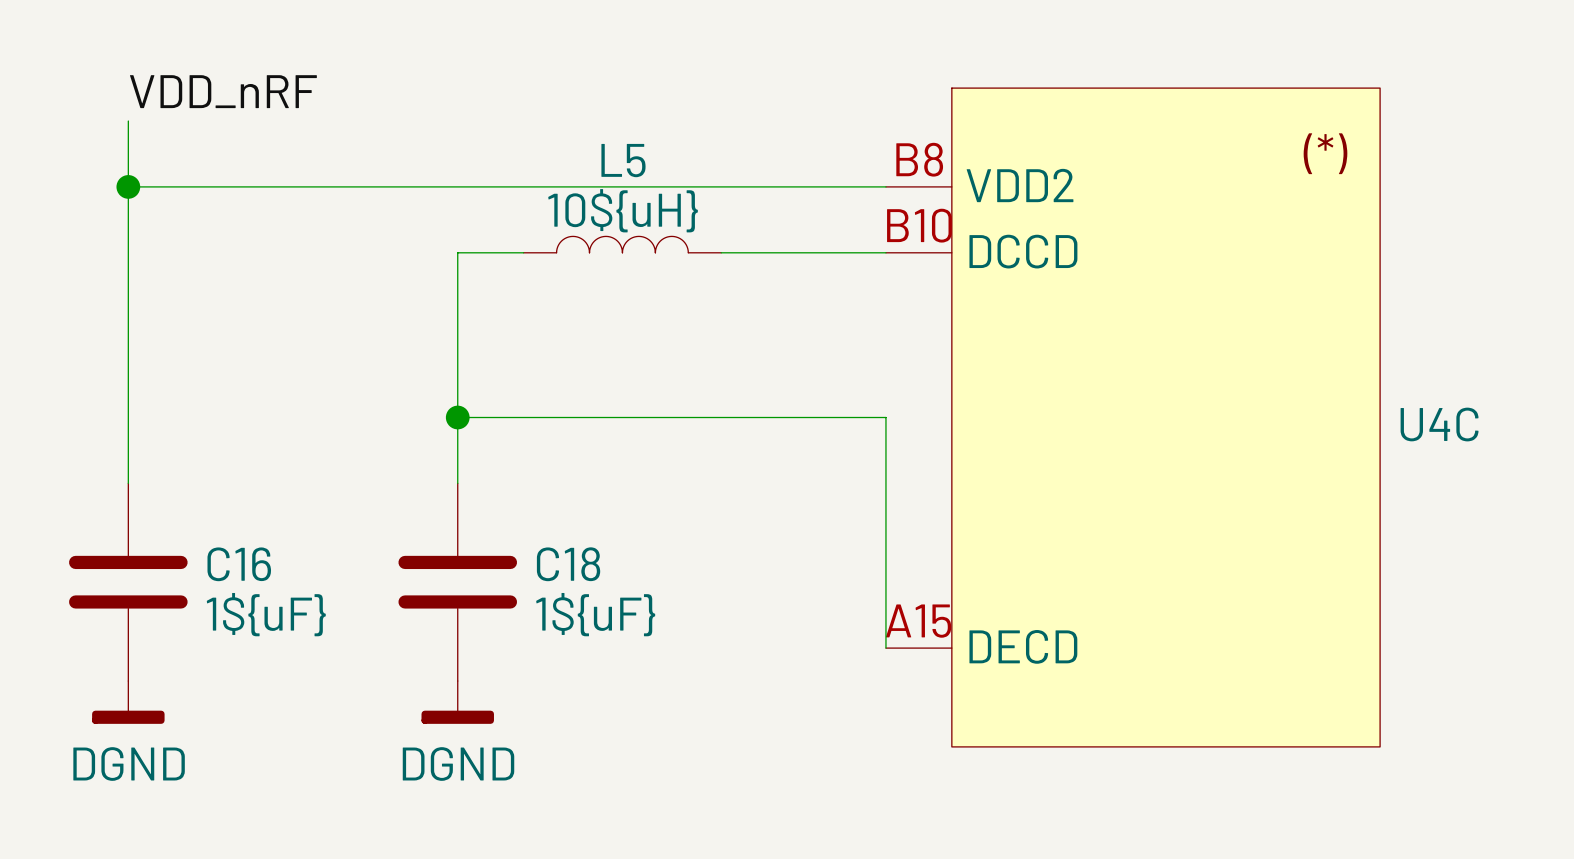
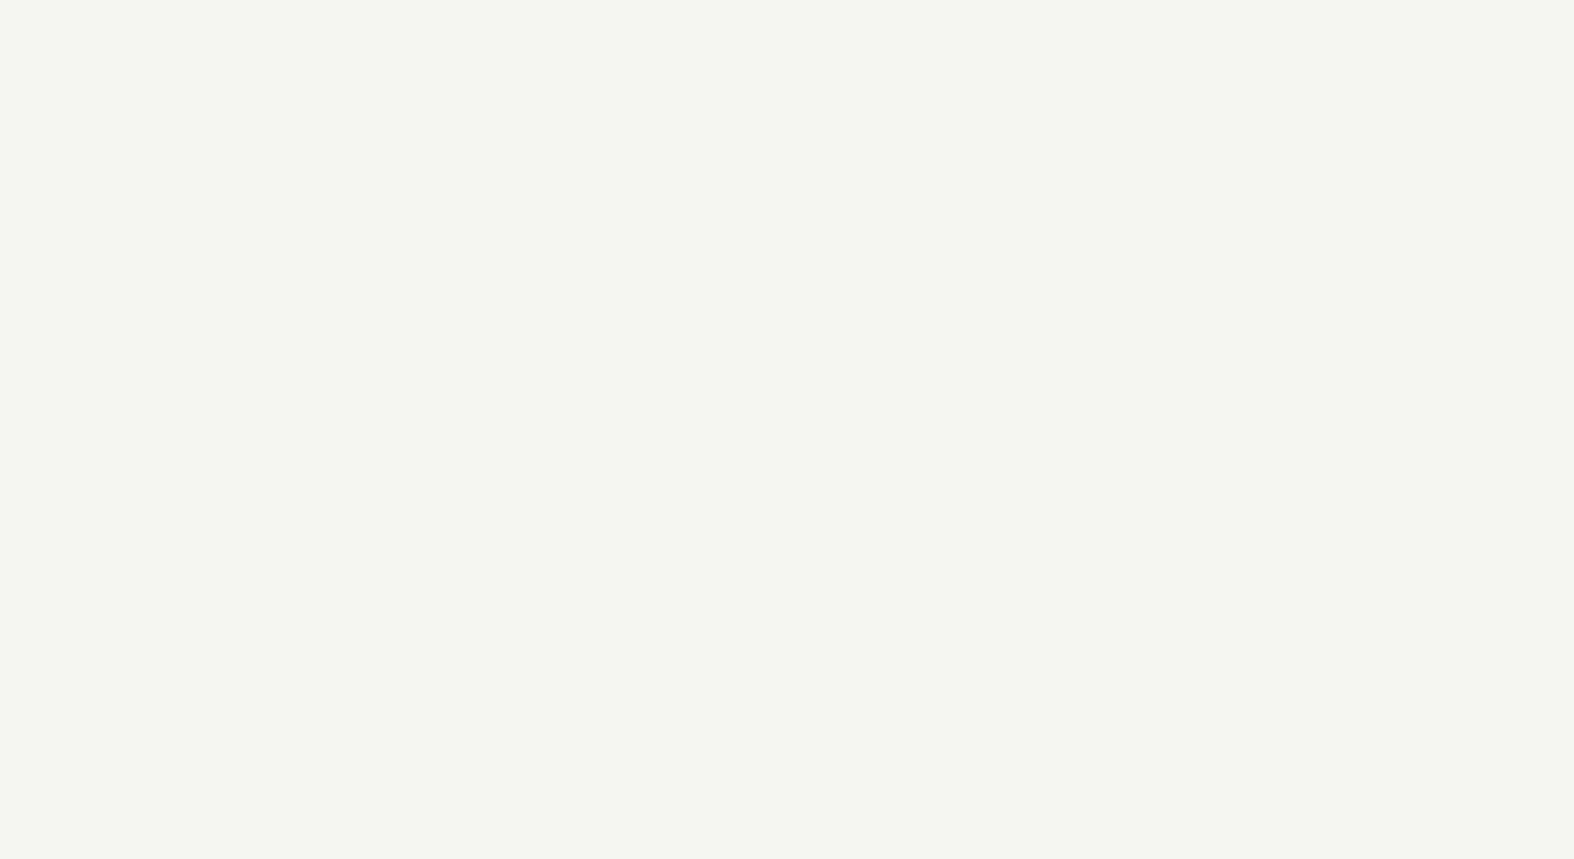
label: VDD_nRF (223, 91) -> none
wire: (128, 121) (128, 483) -> none
wire: (128, 186) (885, 186) -> none
junction: (128, 186) -> none
L5: 10${uH} (622, 244) -> none
wire: (523, 252) (457, 252) (457, 483) -> none
wire: (721, 252) (885, 252) -> none
wire: (457, 417) (885, 417) (885, 648) -> none
junction: (457, 417) -> none
U4C: (1133, 417) -> none
C16: 1${uF} (128, 582) -> none
C18: 1${uF} (457, 582) -> none
power symbol: DGND (128, 702) -> none
power symbol: DGND (457, 702) -> none

